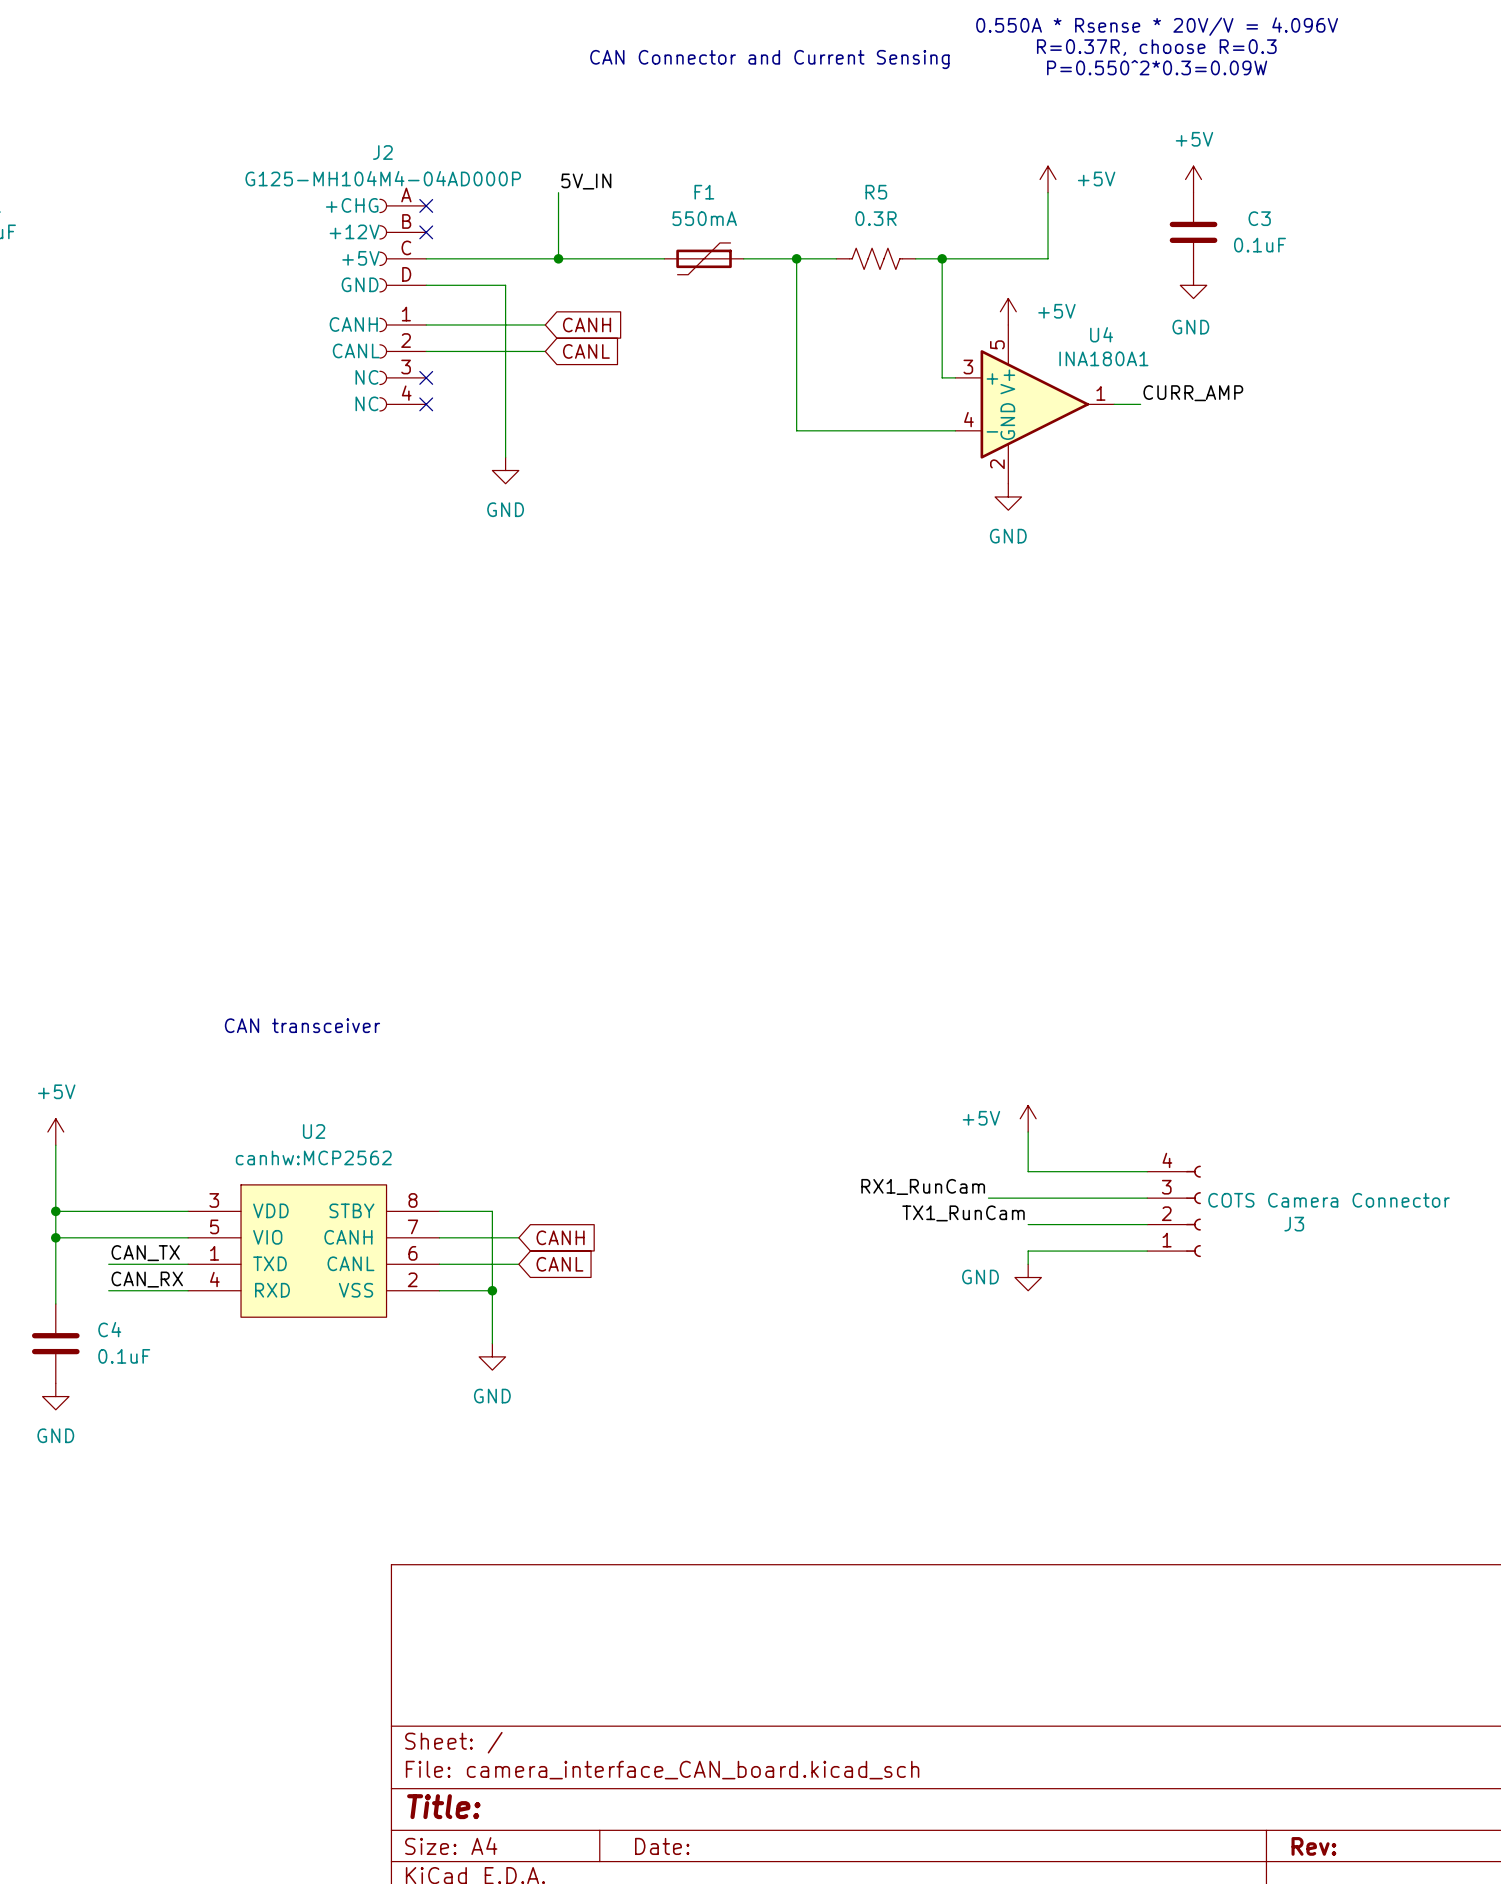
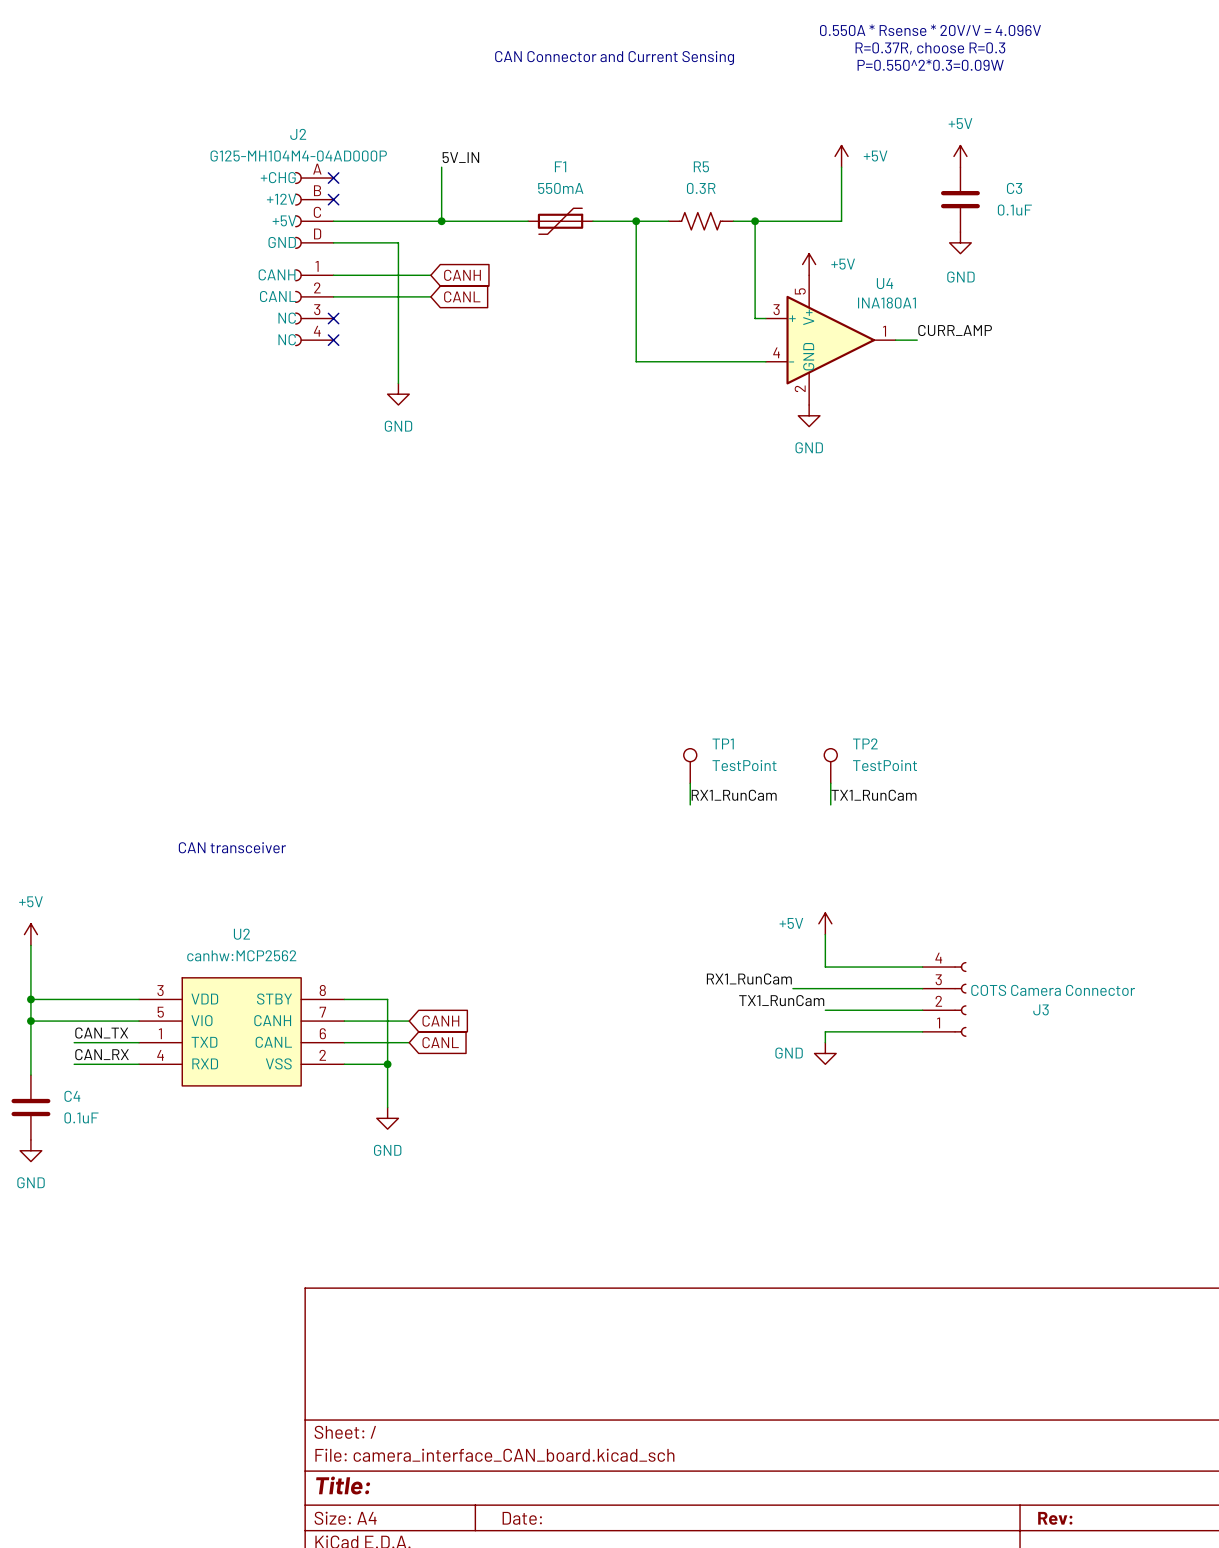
TP1: none -> TestPoint (690, 765)
TP2: none -> TestPoint (830, 765)
wire: none -> (690, 783) (690, 804)
wire: none -> (830, 783) (830, 804)
label: none -> RX1_RunCam (734, 795)
label: none -> TX1_RunCam (873, 795)

